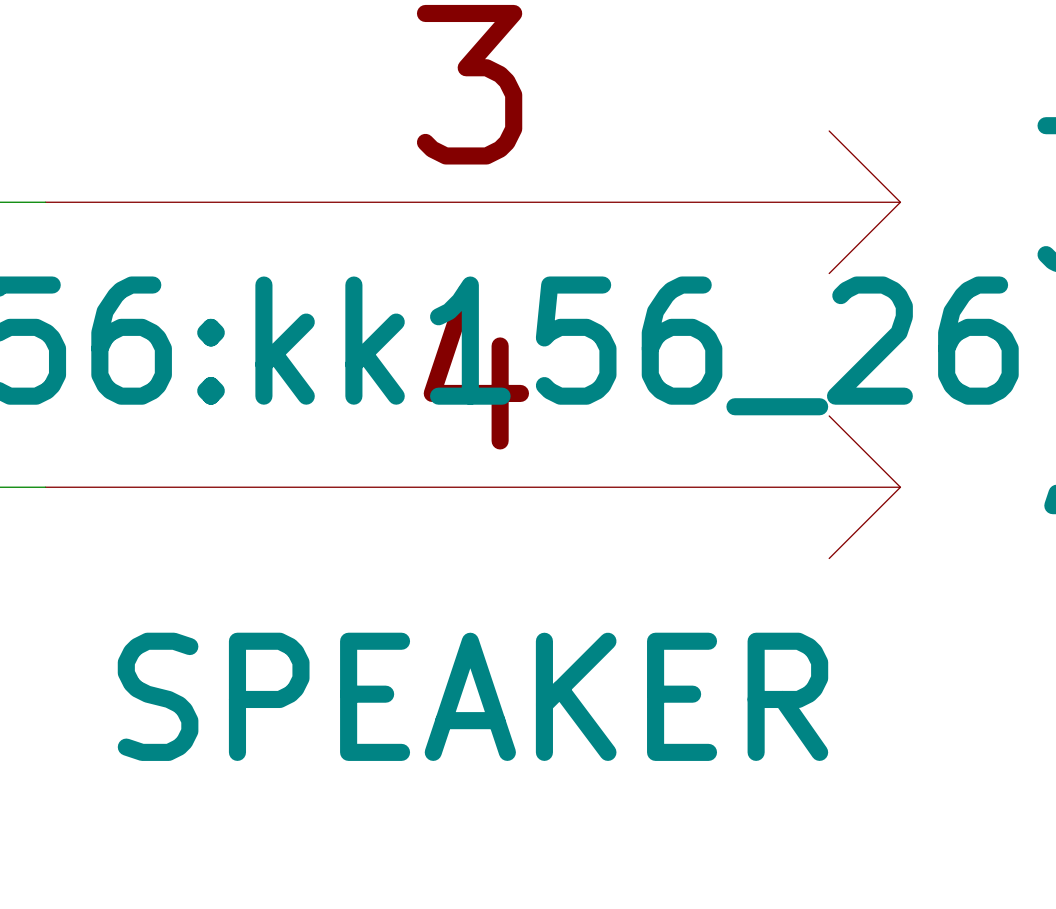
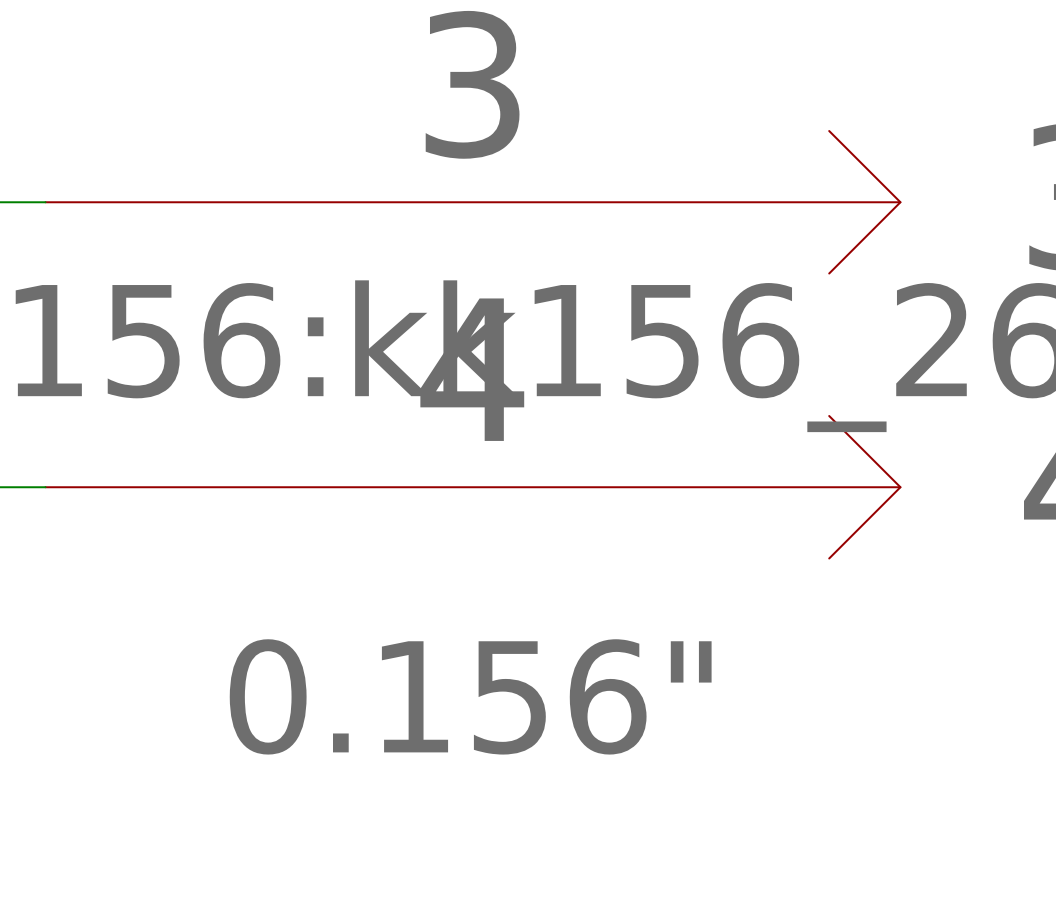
part value: SPEAKER (472, 696) -> 0.156" (470, 696)

